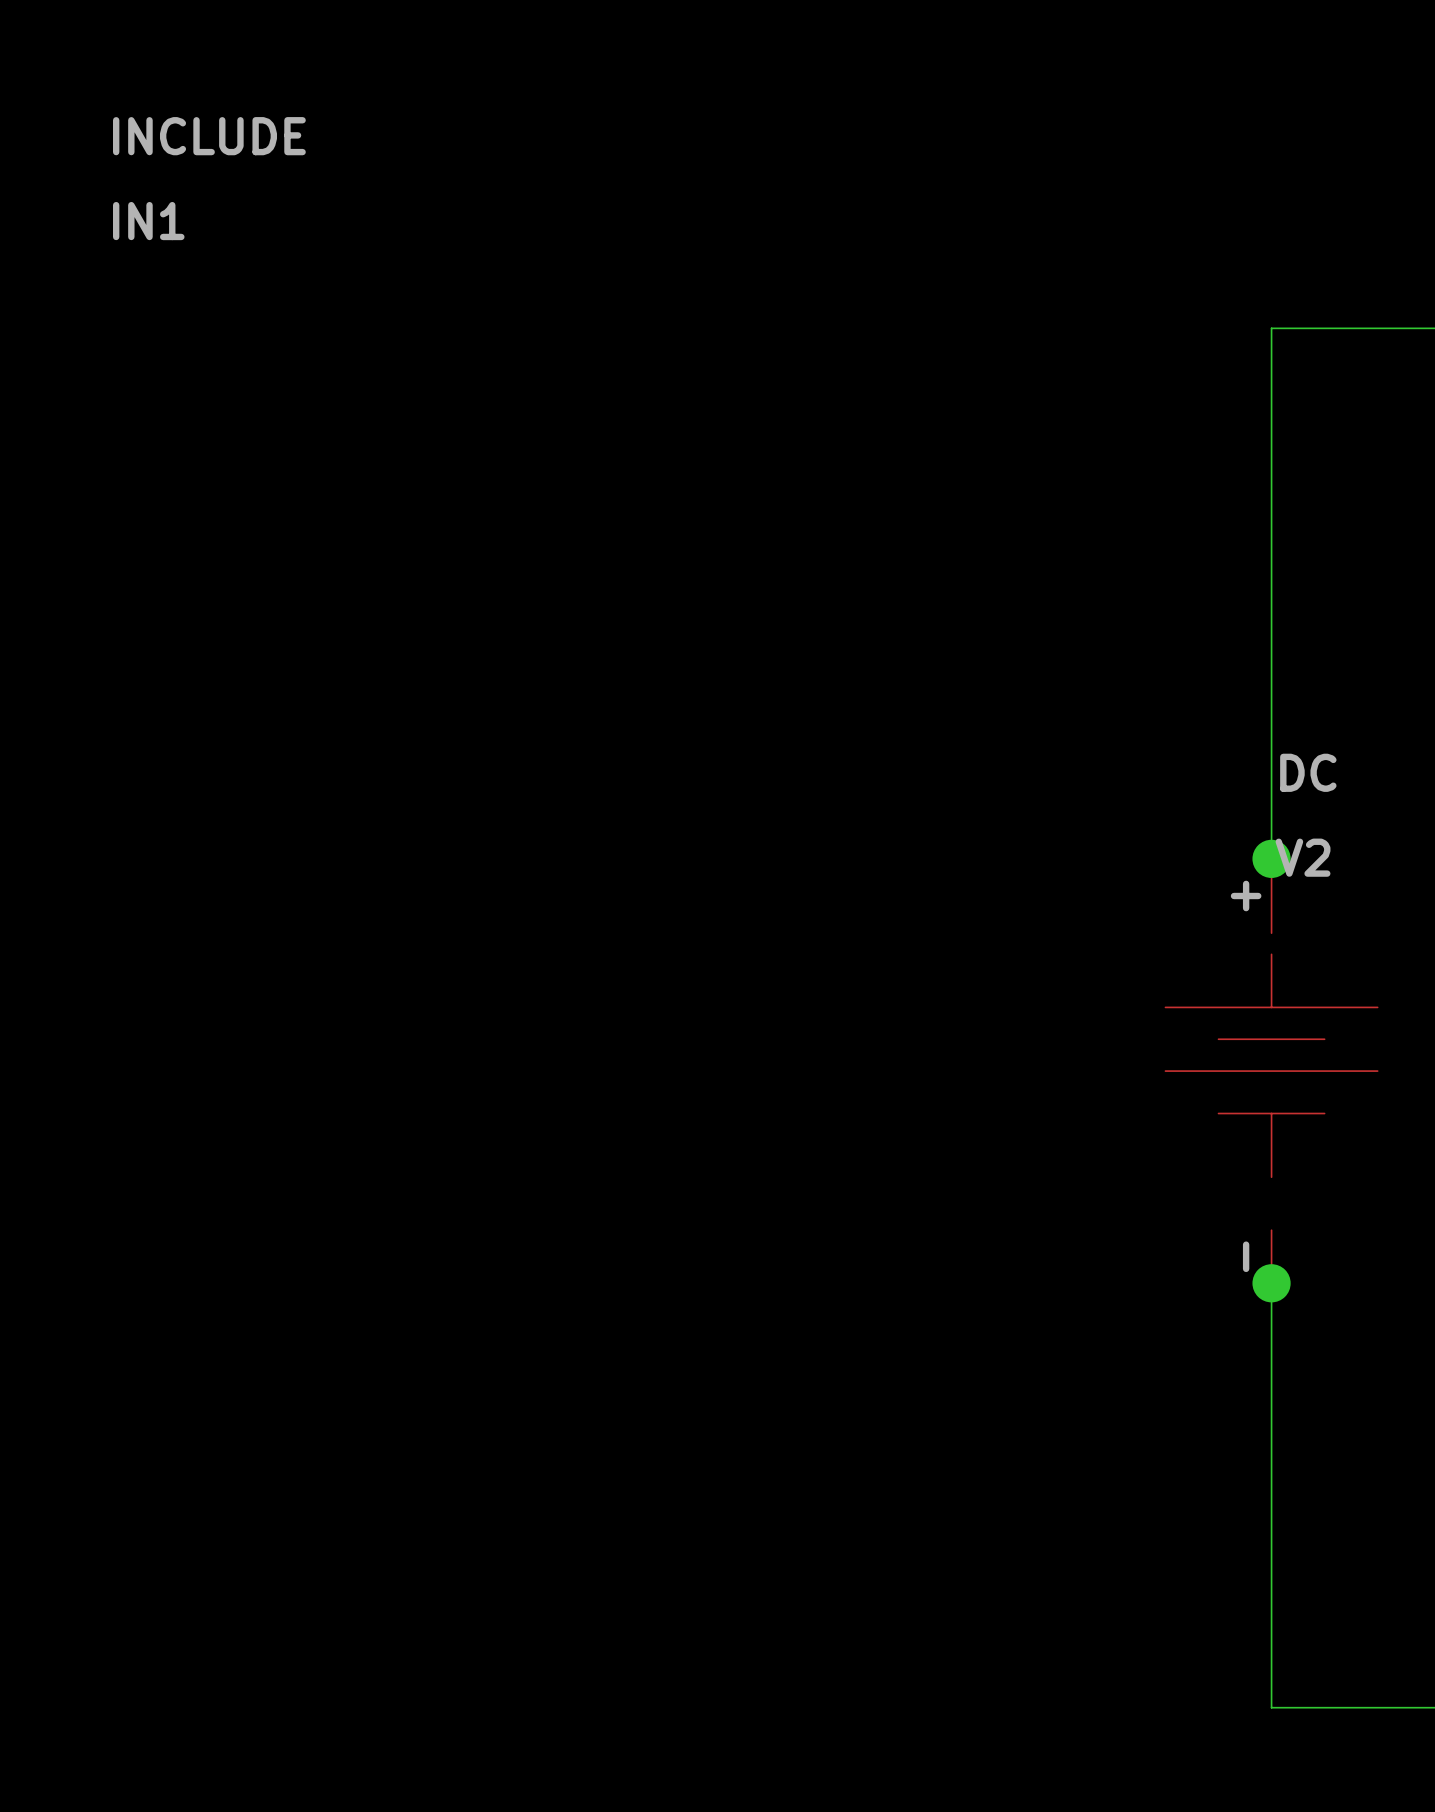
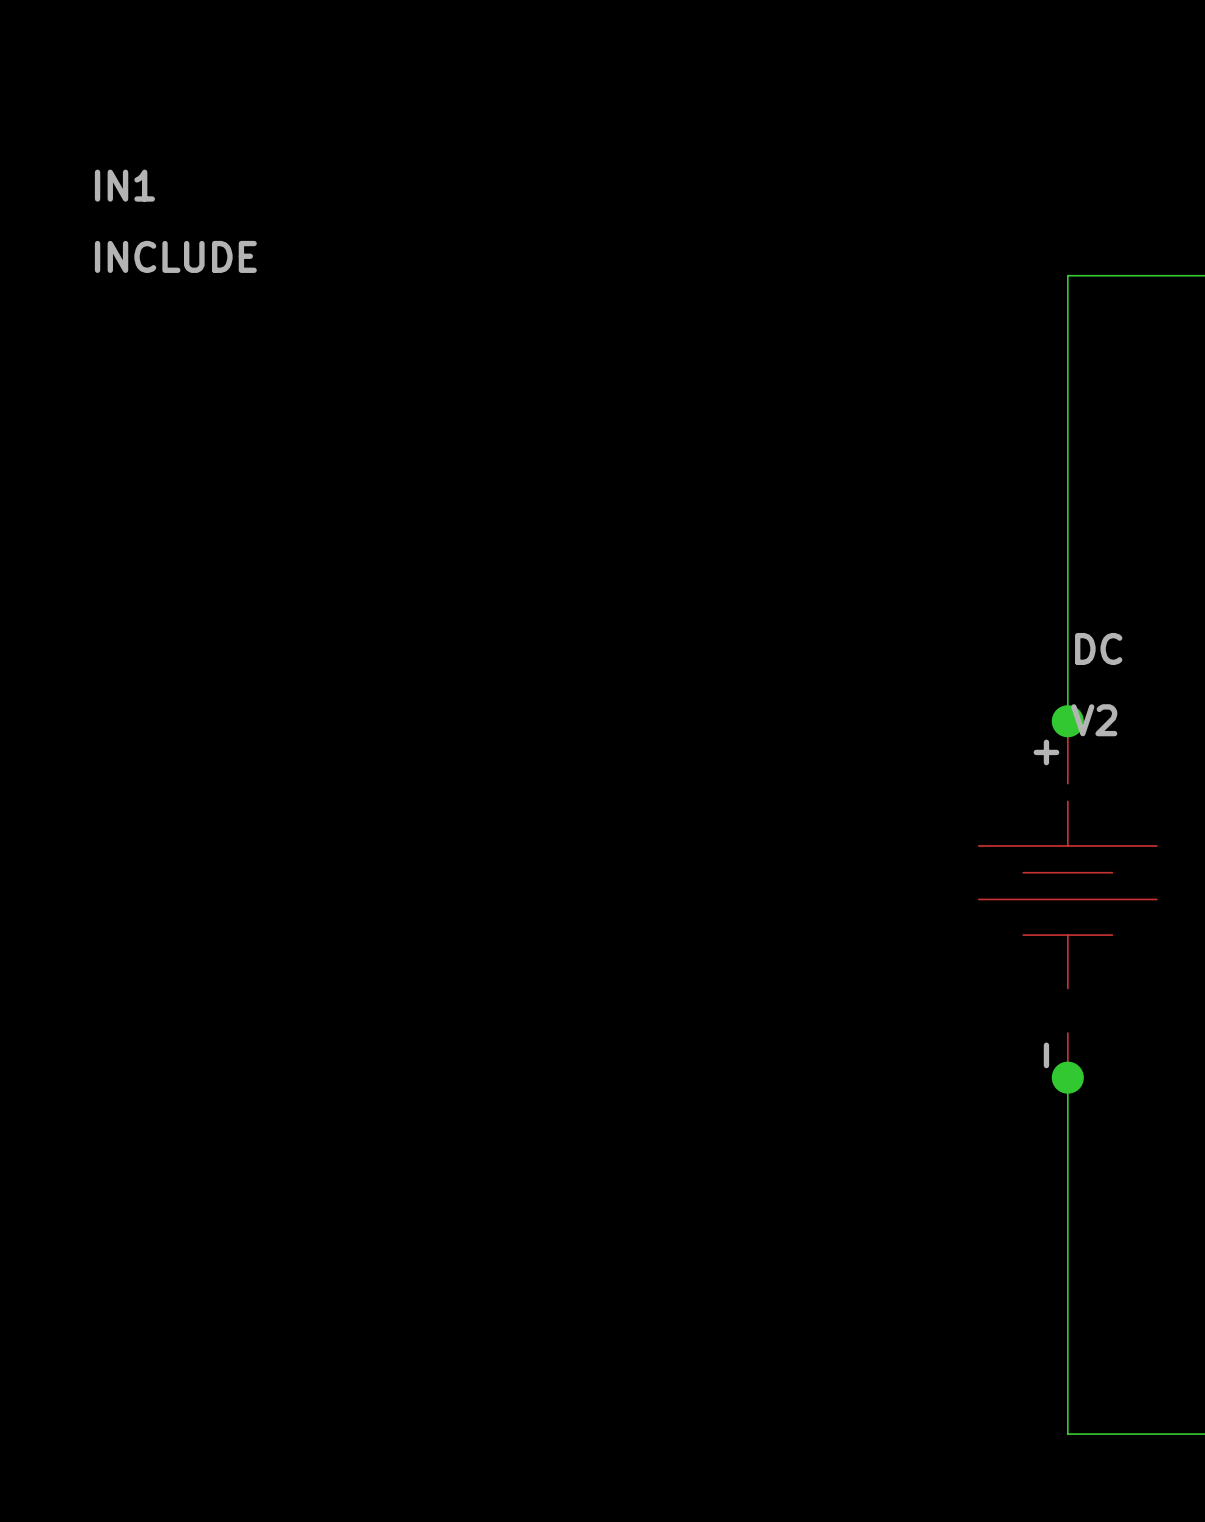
IN1 value position: INCLUDE (209, 136) -> INCLUDE (175, 256)
IN1 position: (209, 178) -> (175, 221)

